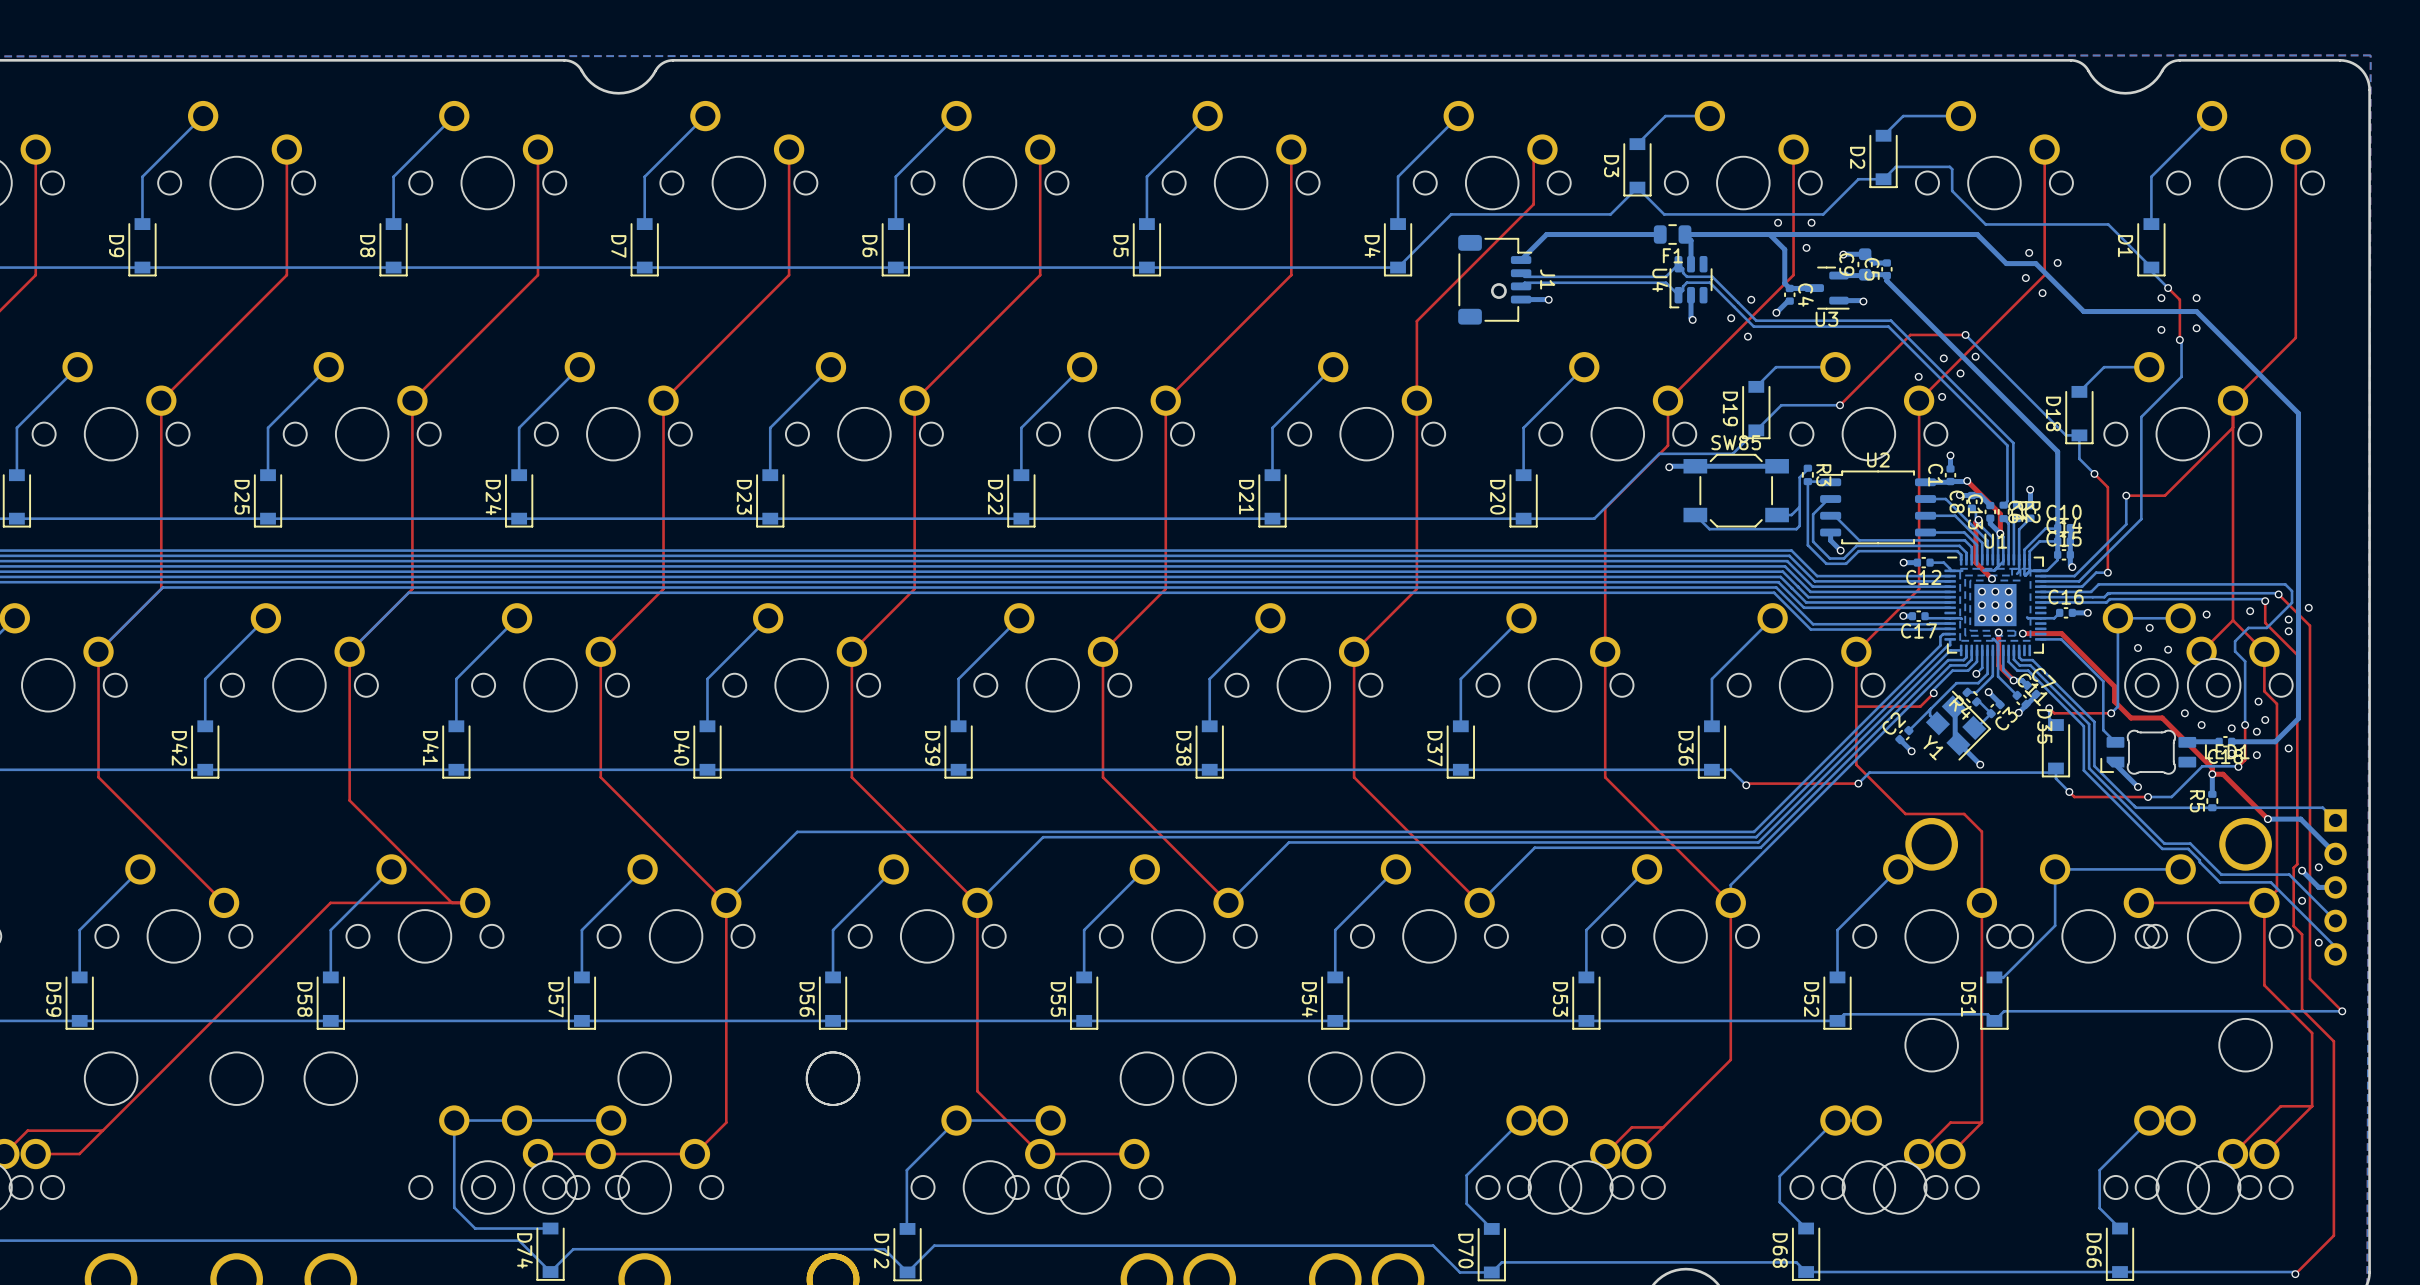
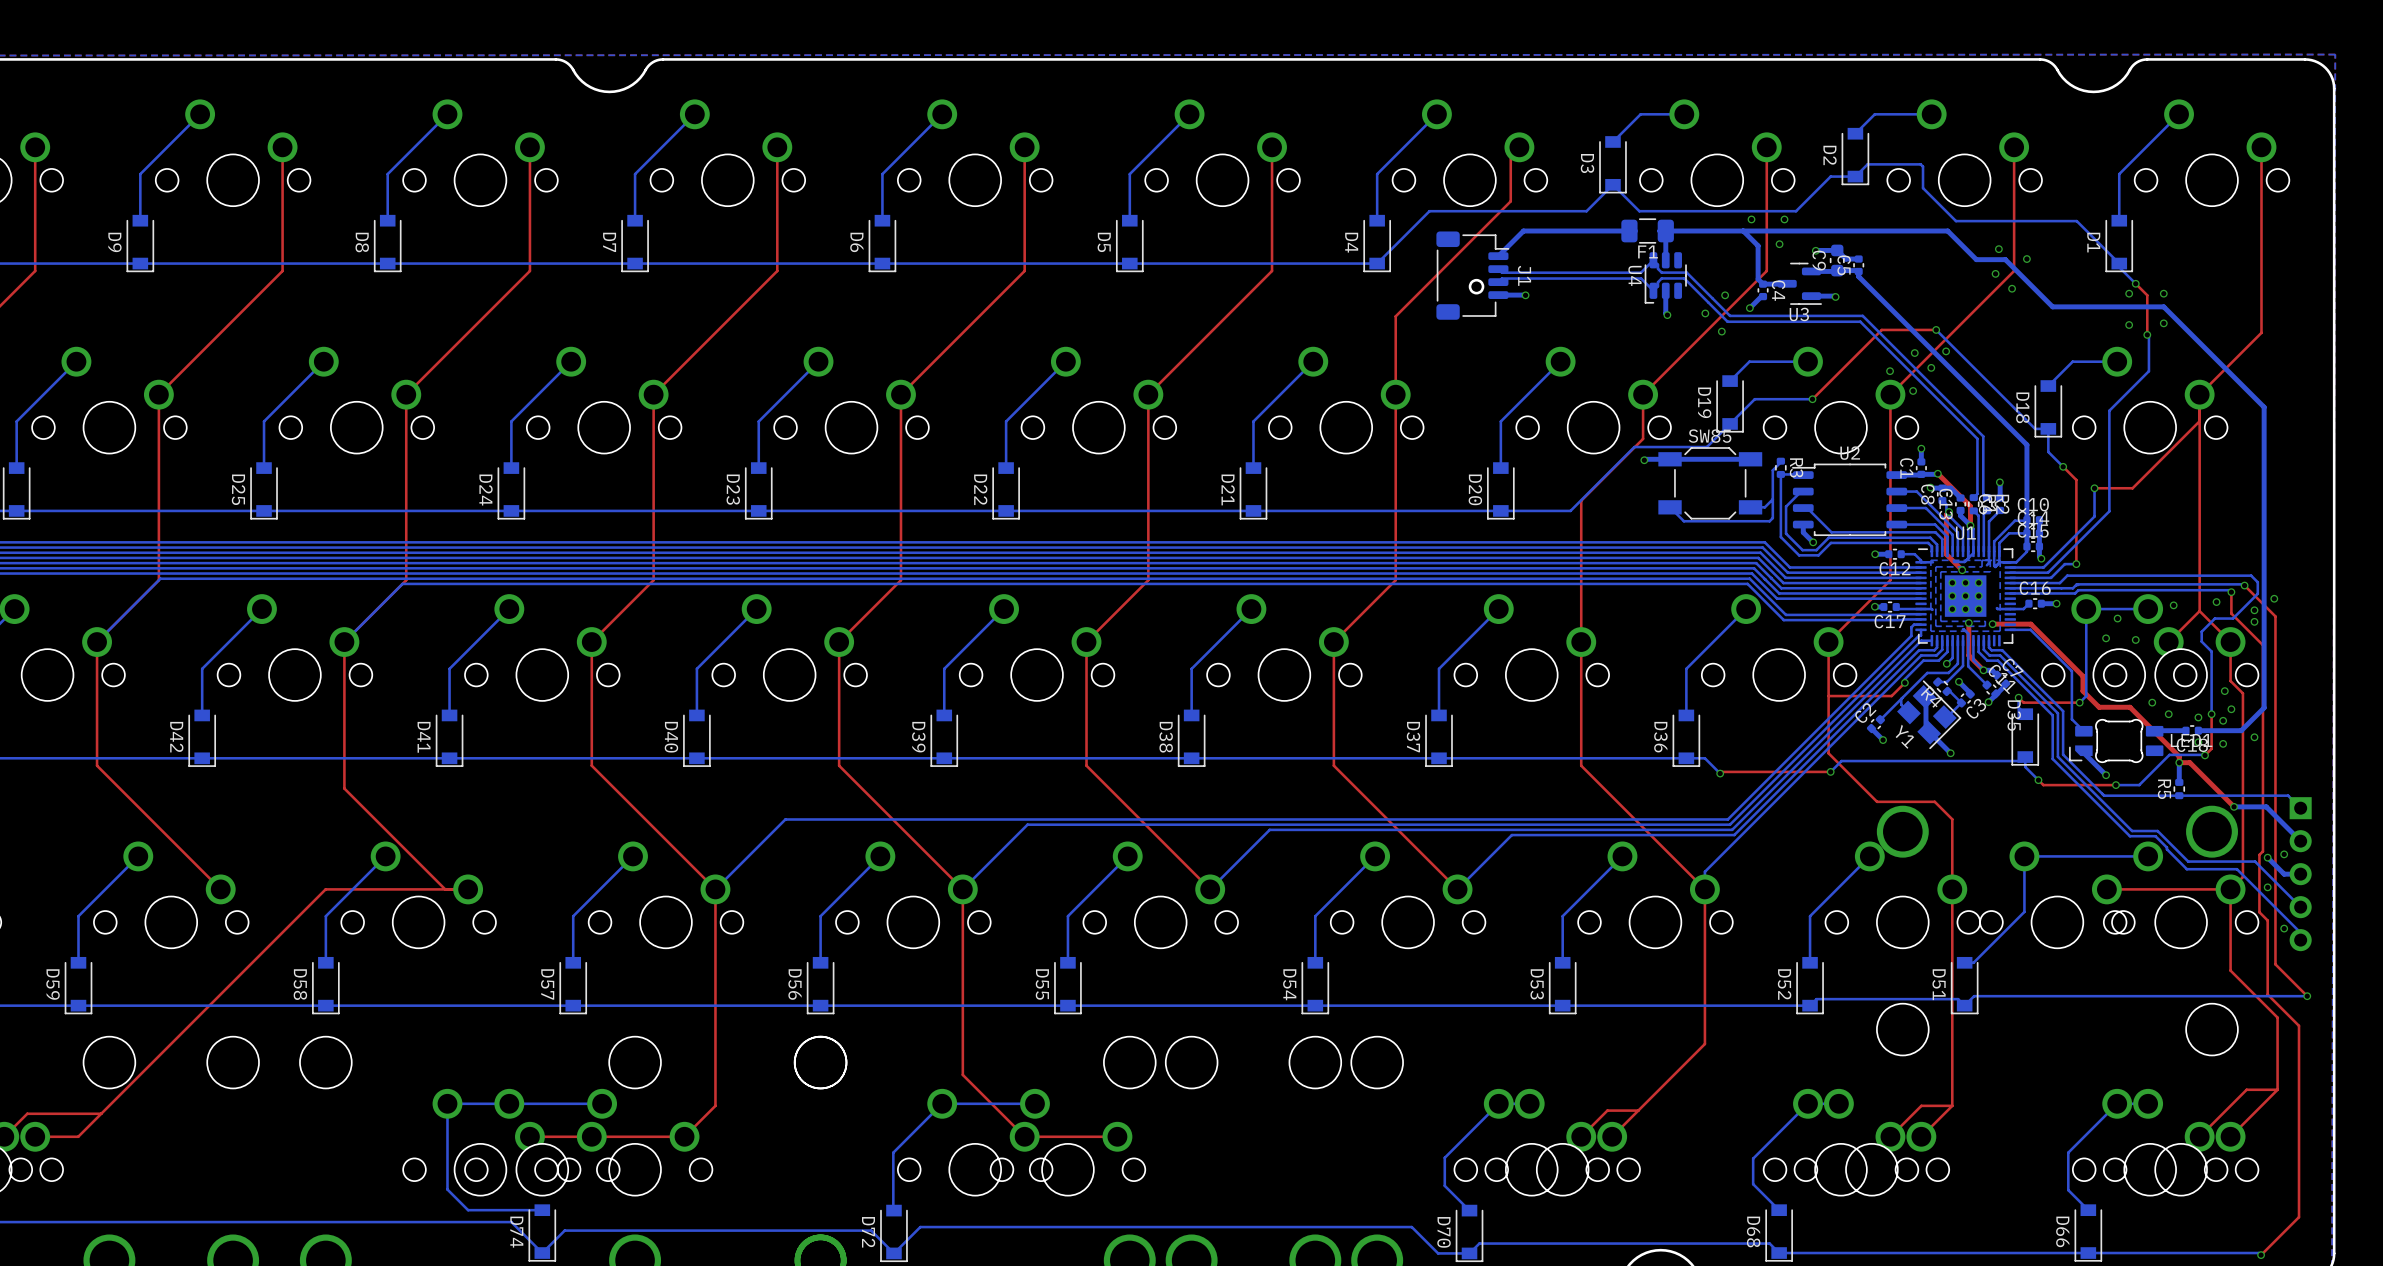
F1 footprint: [1653, 224, 1692, 245] -> [1621, 218, 1674, 244]

